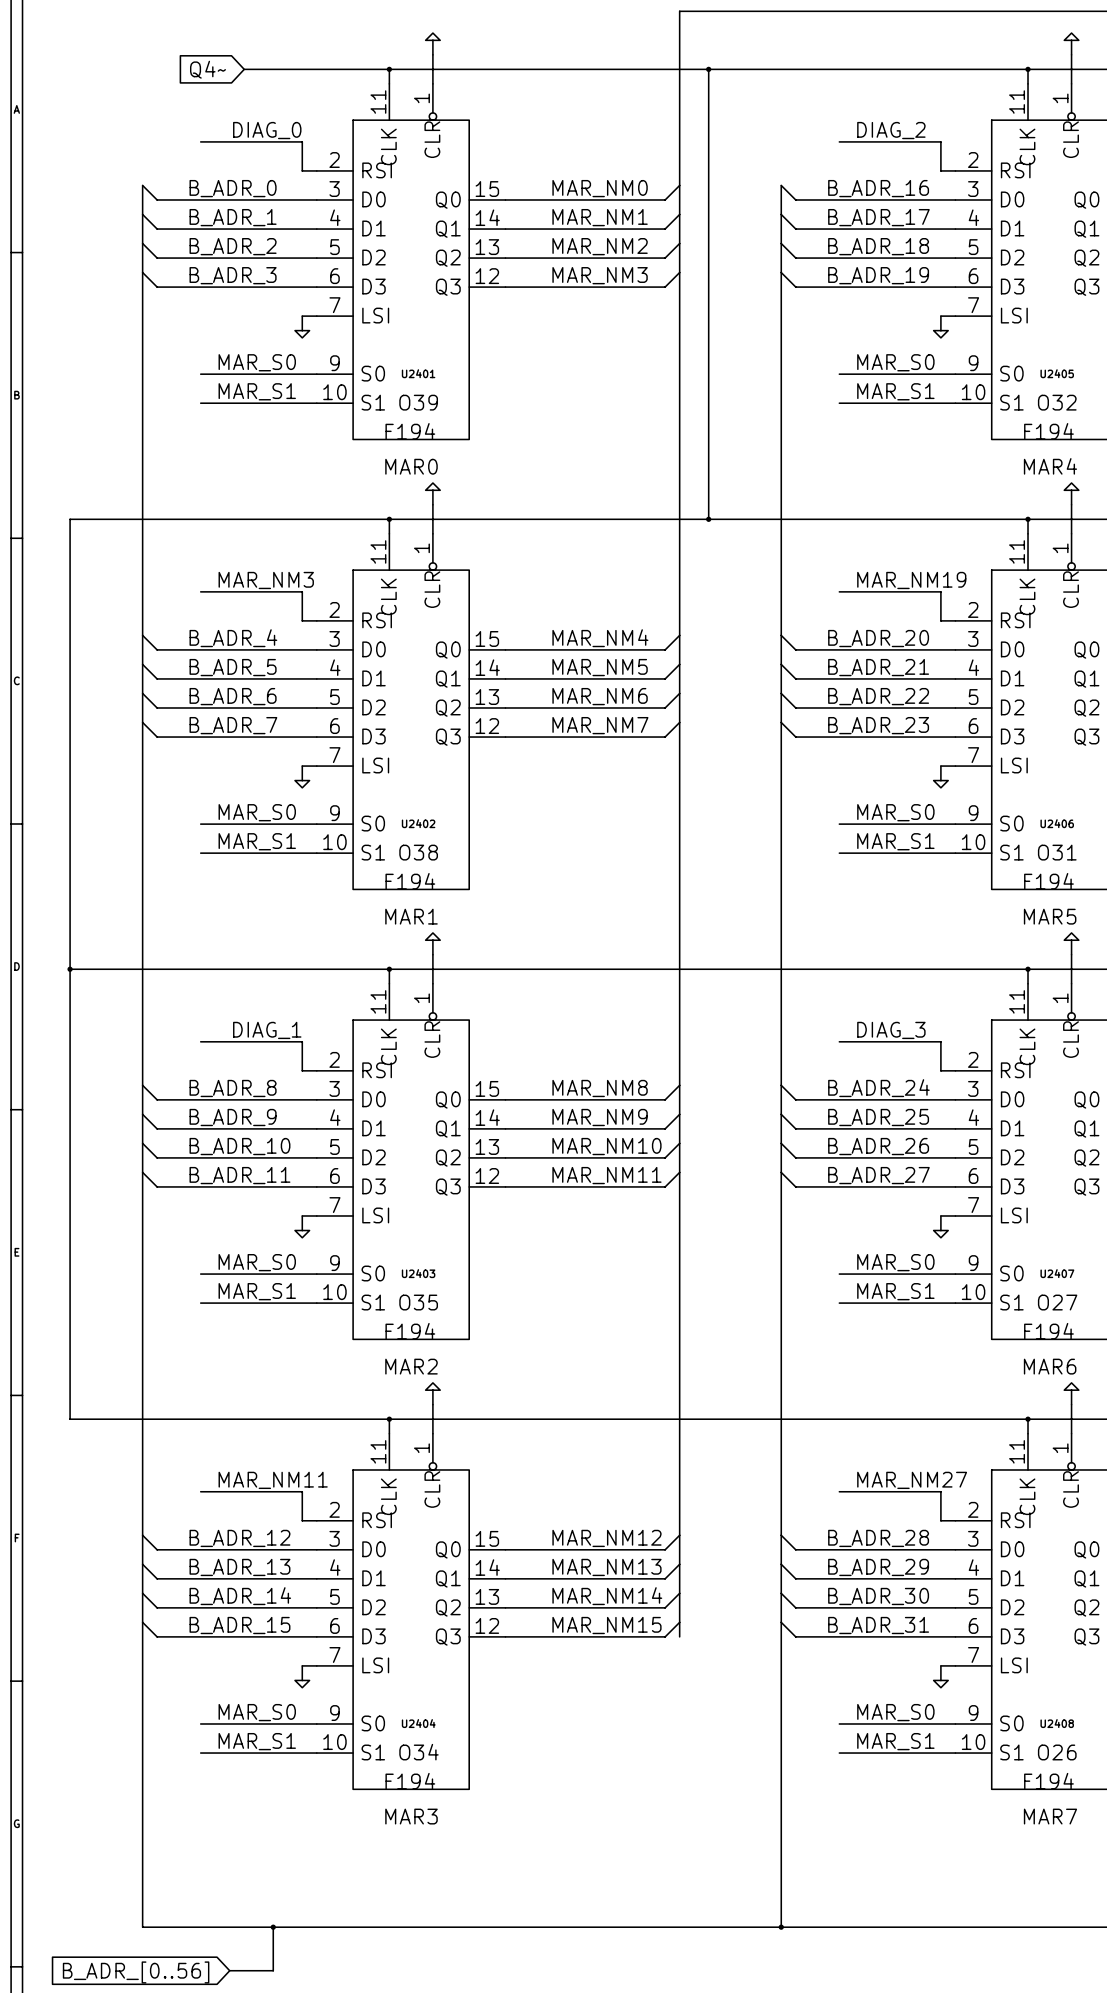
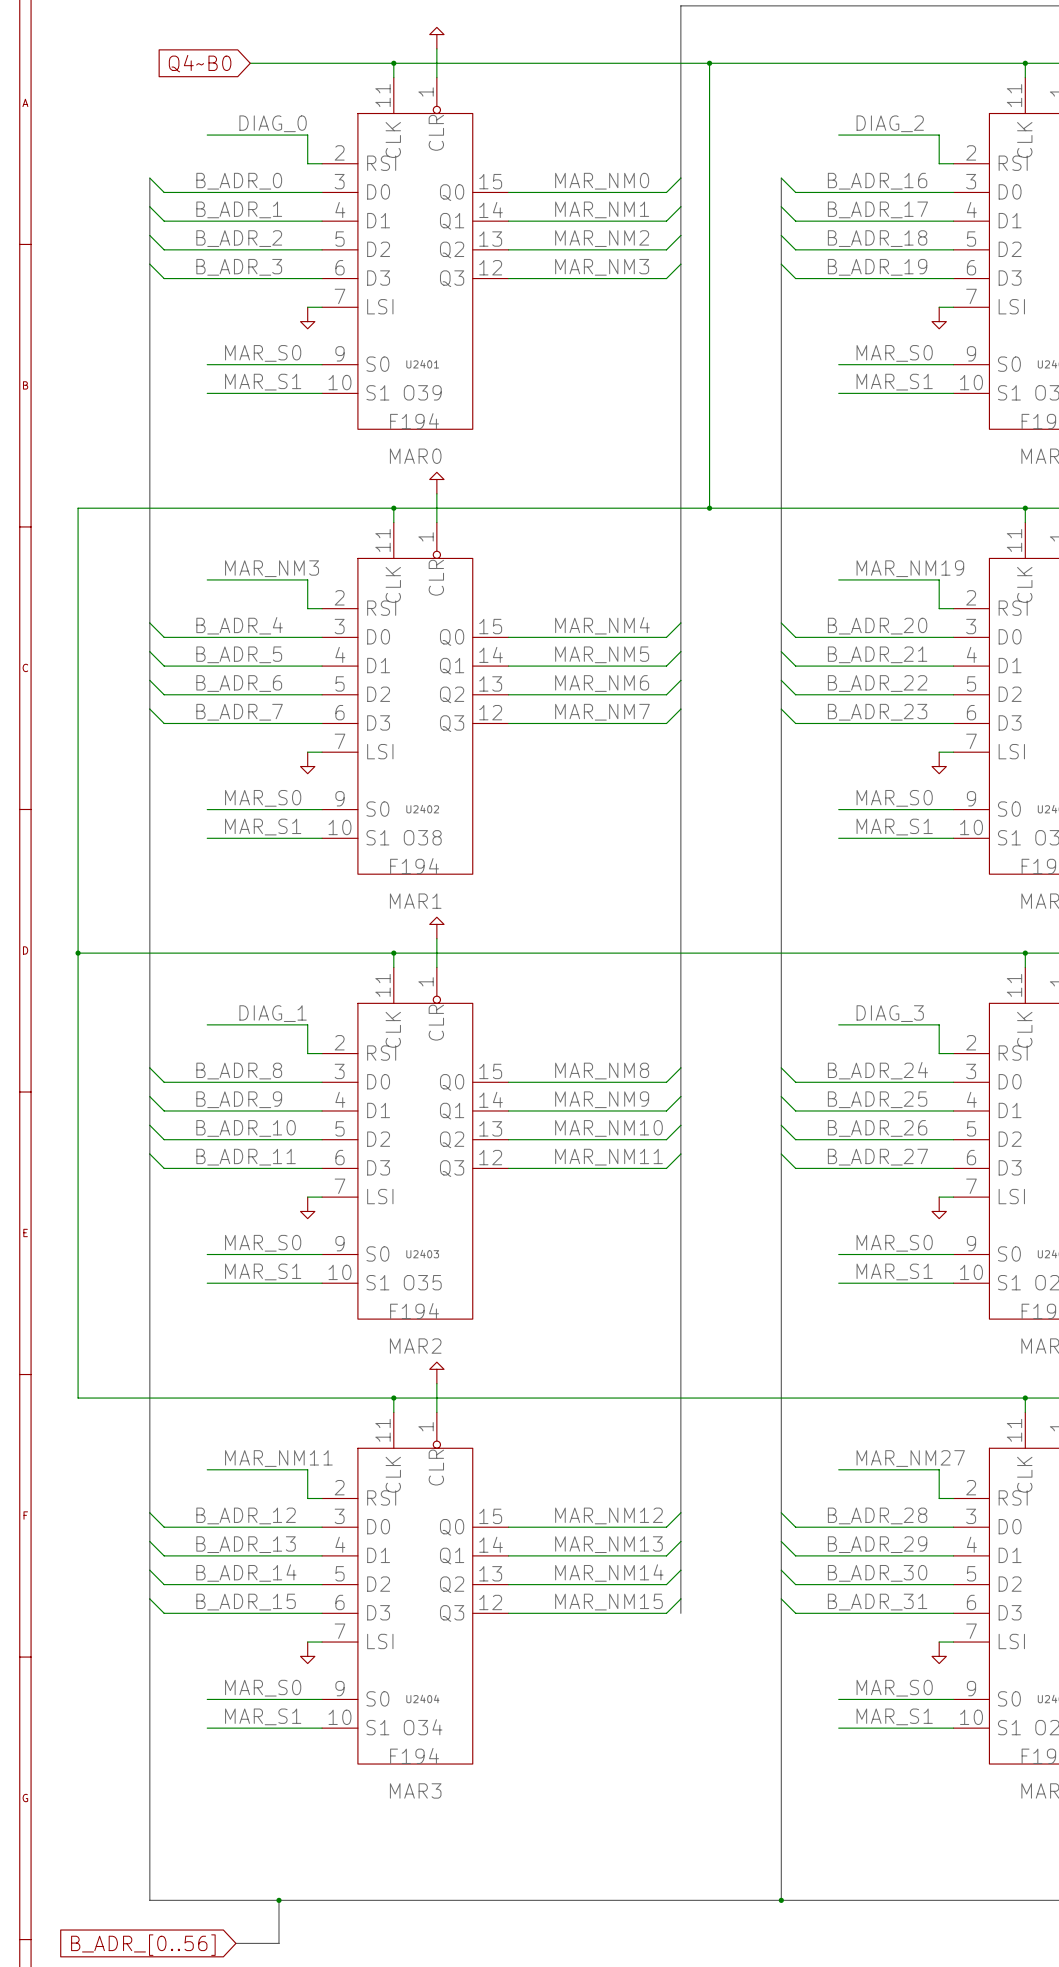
global label: Q4~ (207, 69) -> Q4~B0 (200, 63)

